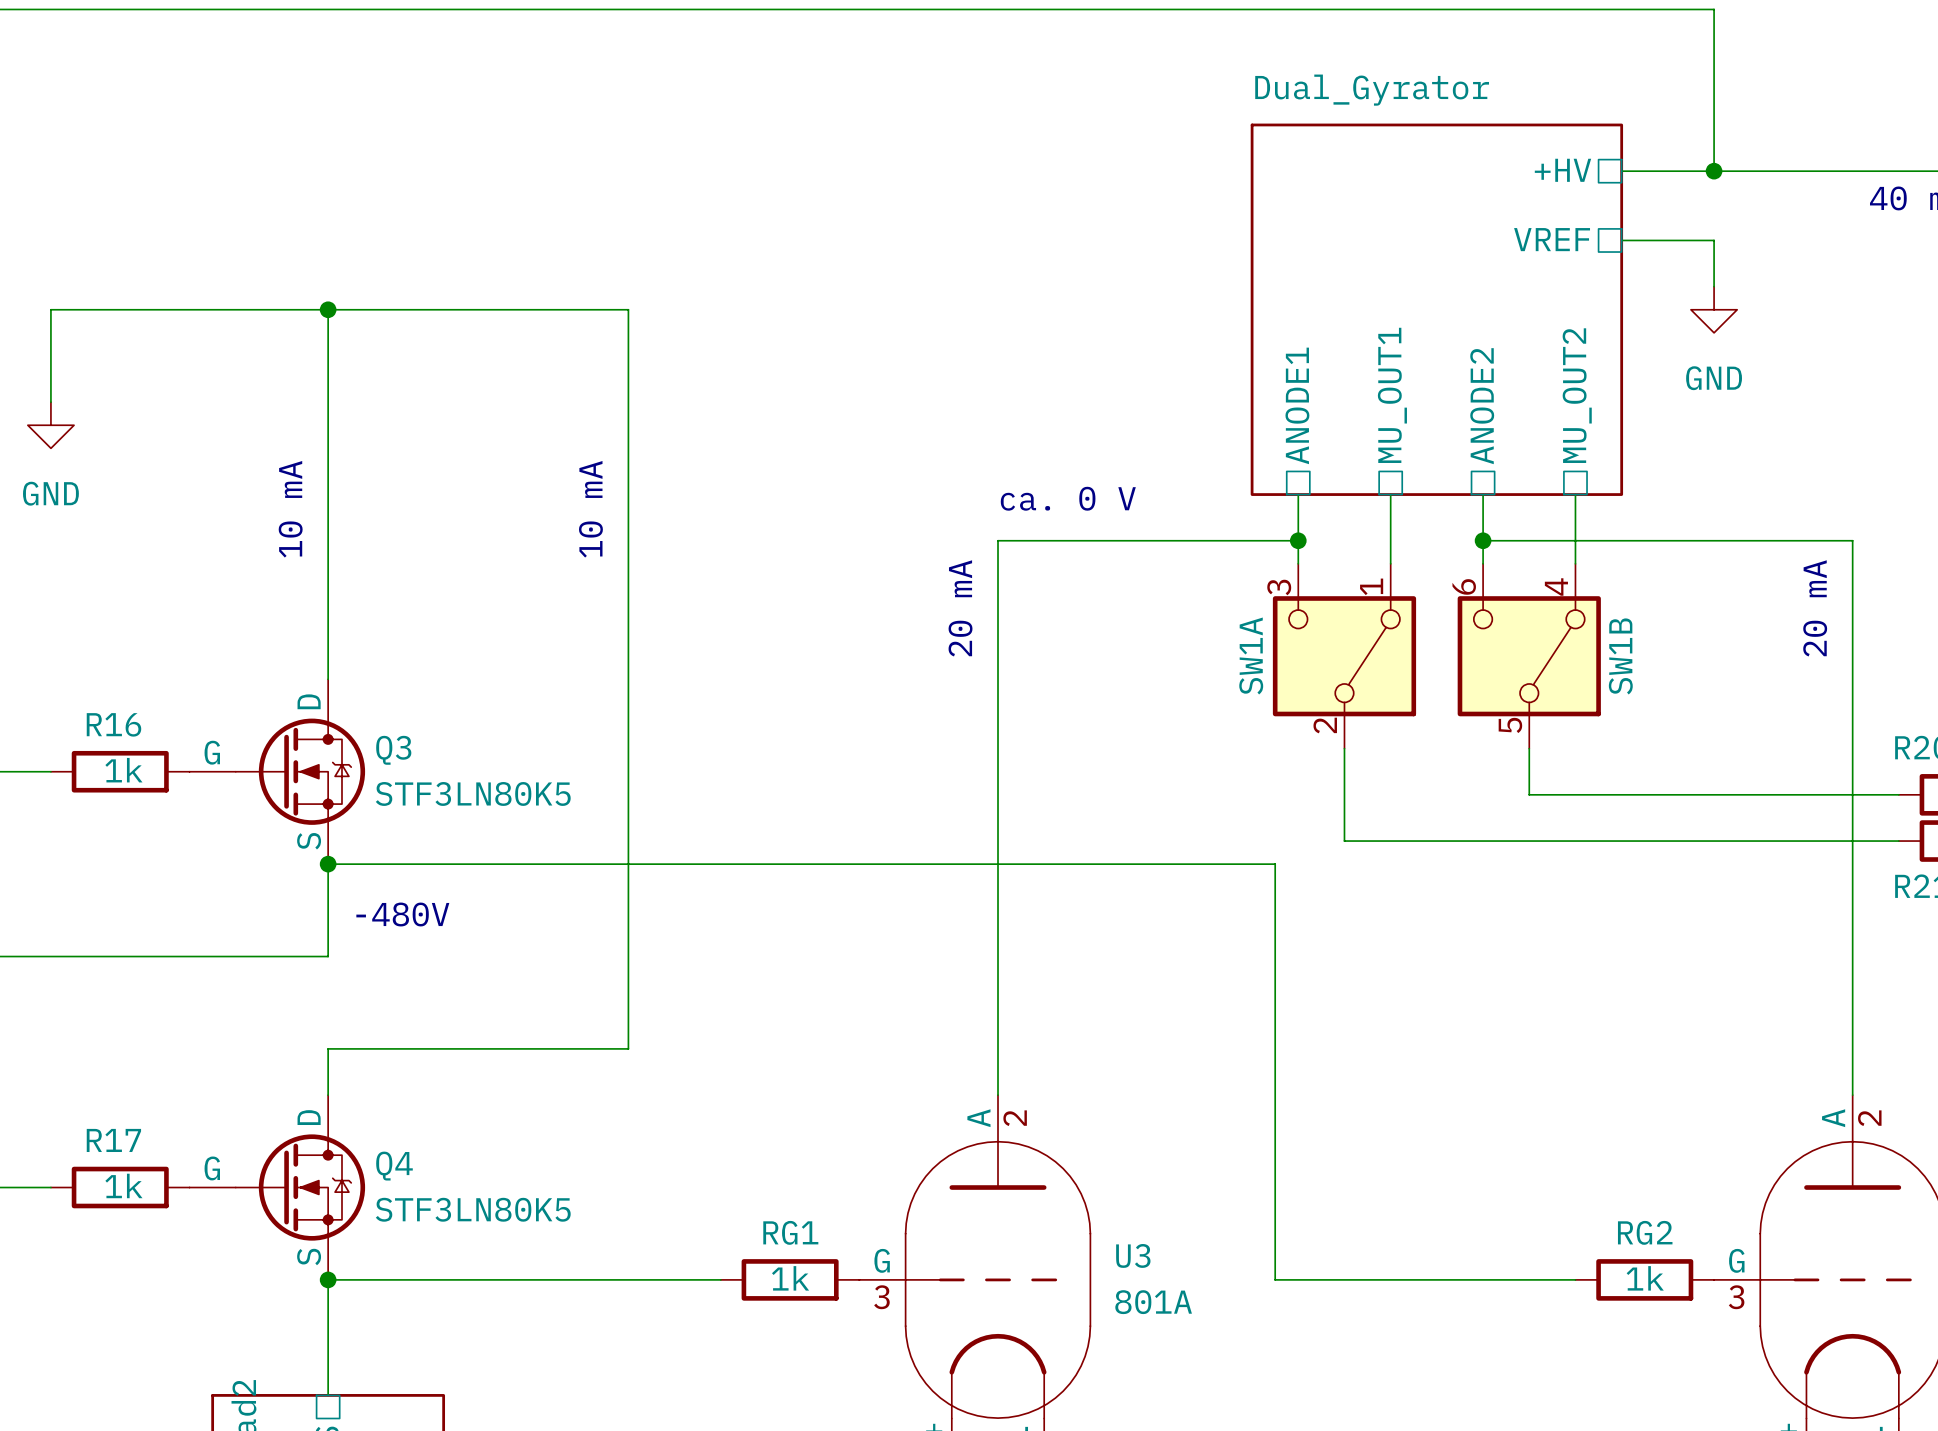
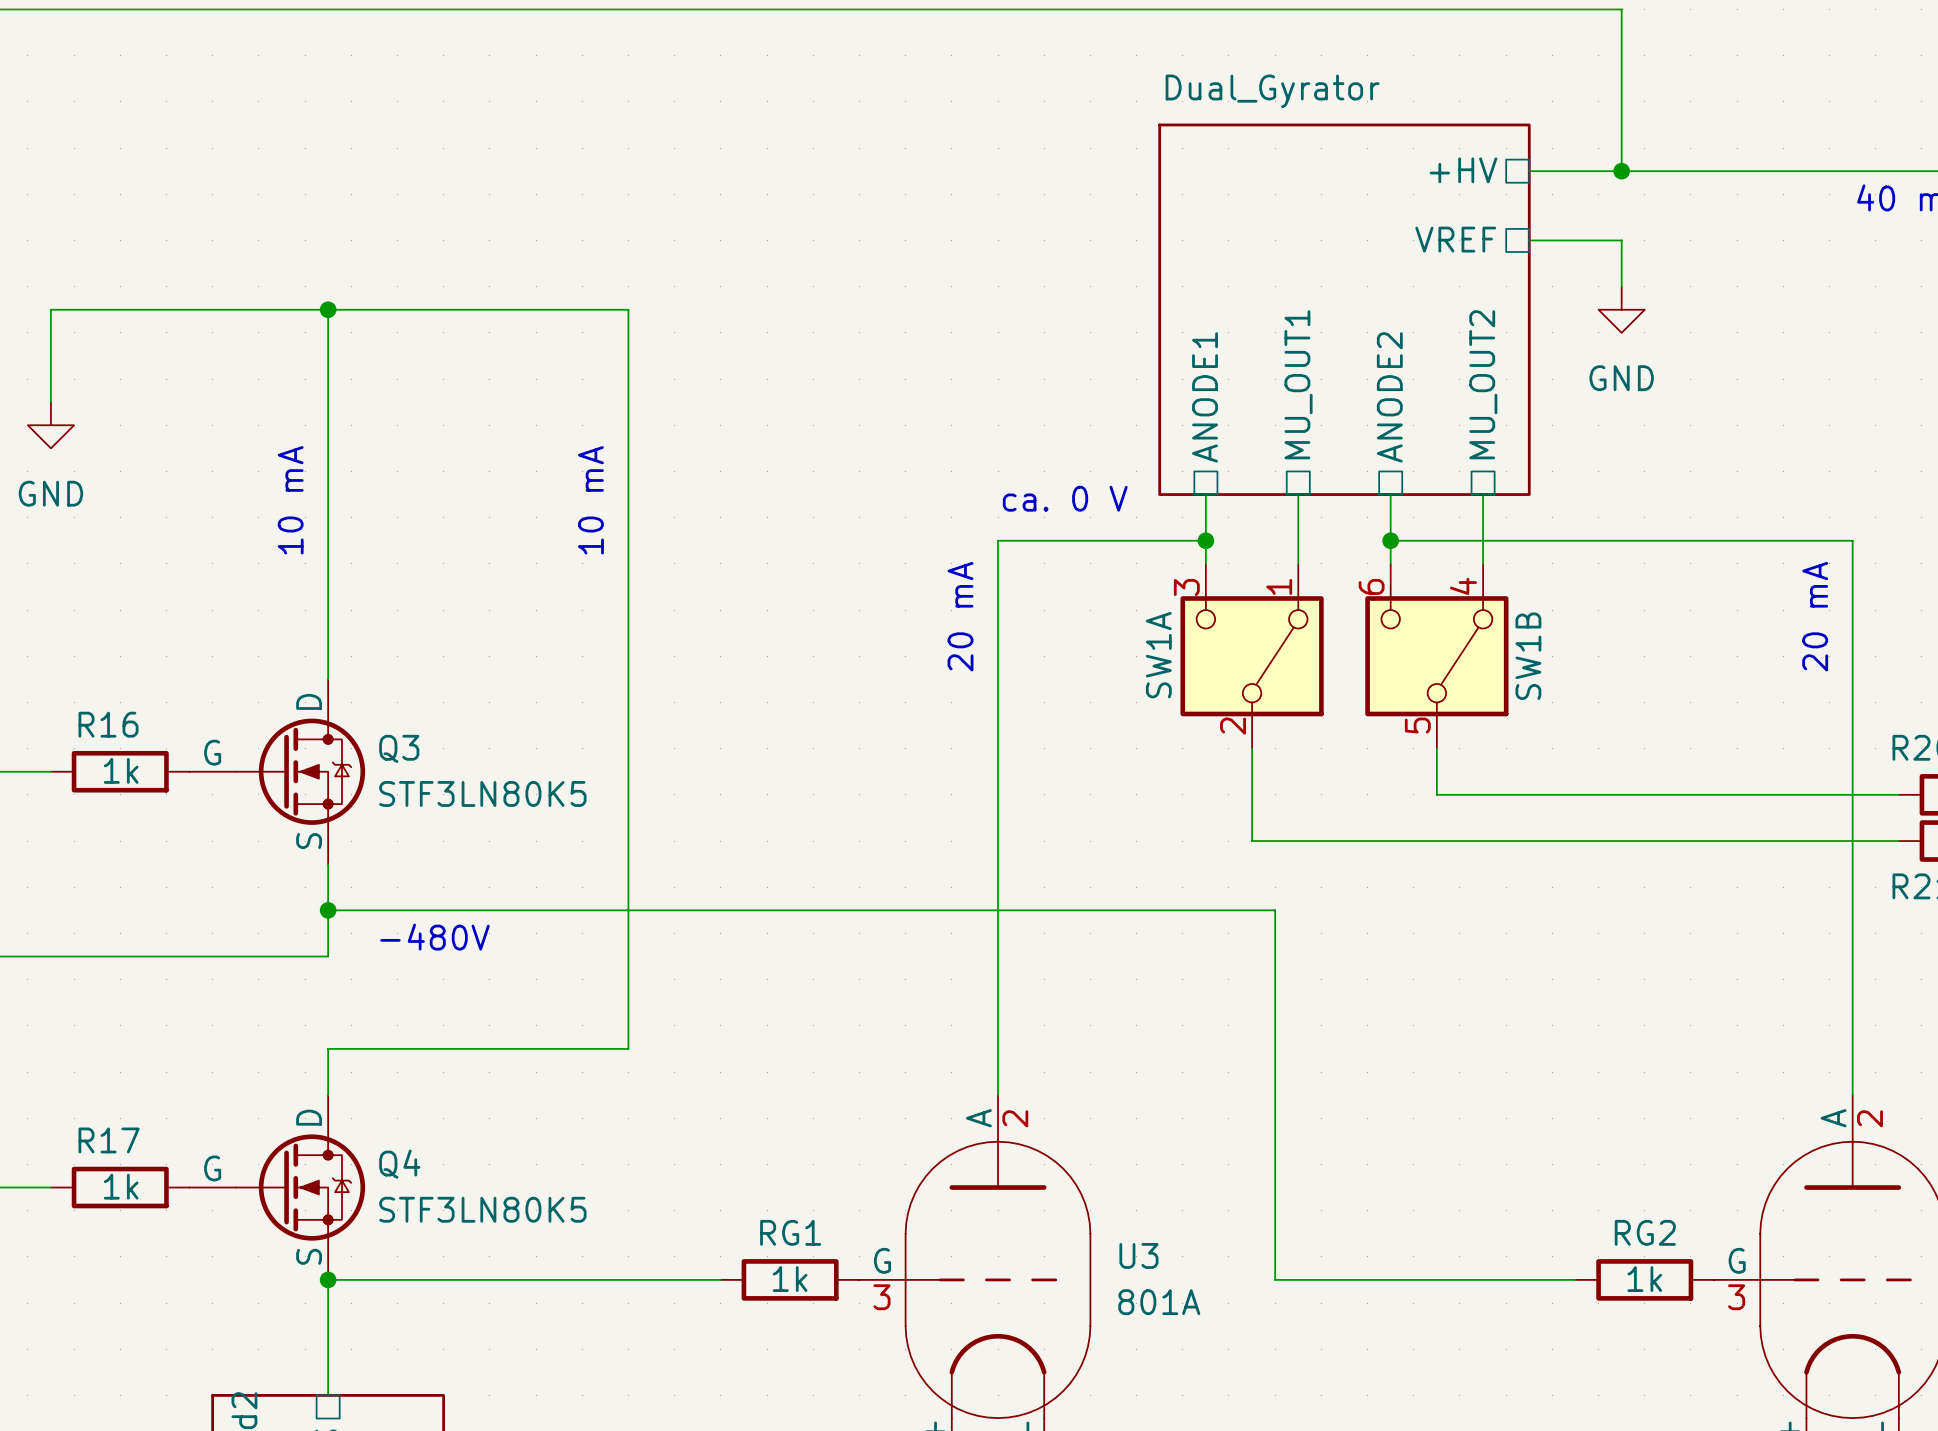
wire: (1621, 9) (1714, 9) (1714, 171) -> (1621, 9) (1621, 171) (1529, 171)
sheet pin position: +HV (1562, 170) -> +HV (1463, 170)
junction position: (1714, 171) -> (1621, 171)
sheet pin position: VREF (1552, 239) -> VREF (1455, 239)
wire: (1621, 240) (1714, 240) (1714, 286) -> (1529, 240) (1621, 240) (1621, 286)
sheet Dual_Gyrator position: (1436, 309) -> (1344, 309)
power symbol position: GND (1714, 309) -> GND (1621, 309)
sheet pin: MU_OUT1 (1392, 395) -> ANODE2 (1389, 397)
sheet pin: MU_OUT2 (1577, 395) -> none
sheet pin: none -> ANODE1 (1205, 397)
sheet pin: ANODE1 (1297, 405) -> MU_OUT1 (1298, 384)
sheet pin: ANODE2 (1482, 406) -> MU_OUT2 (1483, 384)
wire: (1575, 494) (1575, 563) -> (1205, 494) (1205, 563)
wire: (1205, 540) (1298, 540) -> (1390, 540) (1483, 540)
junction: none -> (1205, 540)
junction: (1298, 540) -> none
junction: none -> (1390, 540)
junction: (1483, 540) -> none
SW1A position: (1344, 656) -> (1252, 656)
SW1B position: (1529, 656) -> (1436, 656)
wire: (1344, 748) (1344, 841) -> (1252, 748) (1252, 841) (1344, 841)
wire: (1529, 748) (1529, 794) -> (1436, 748) (1436, 794) (1529, 794)
wire: (328, 864) (1275, 864) (1275, 910) -> (328, 910) (1275, 910)
junction position: (328, 864) -> (328, 910)
text position: -480V (402, 914) -> -480V (435, 937)

